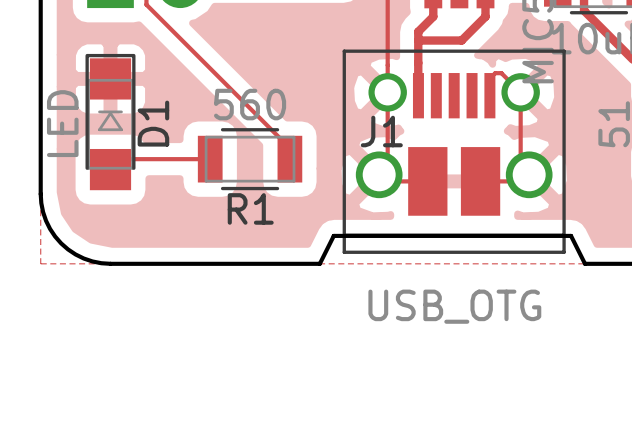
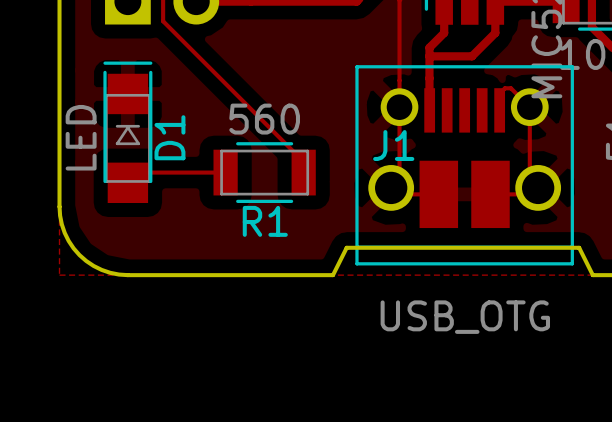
D1 footprint: [85, 53, 136, 191] -> [103, 61, 153, 203]

